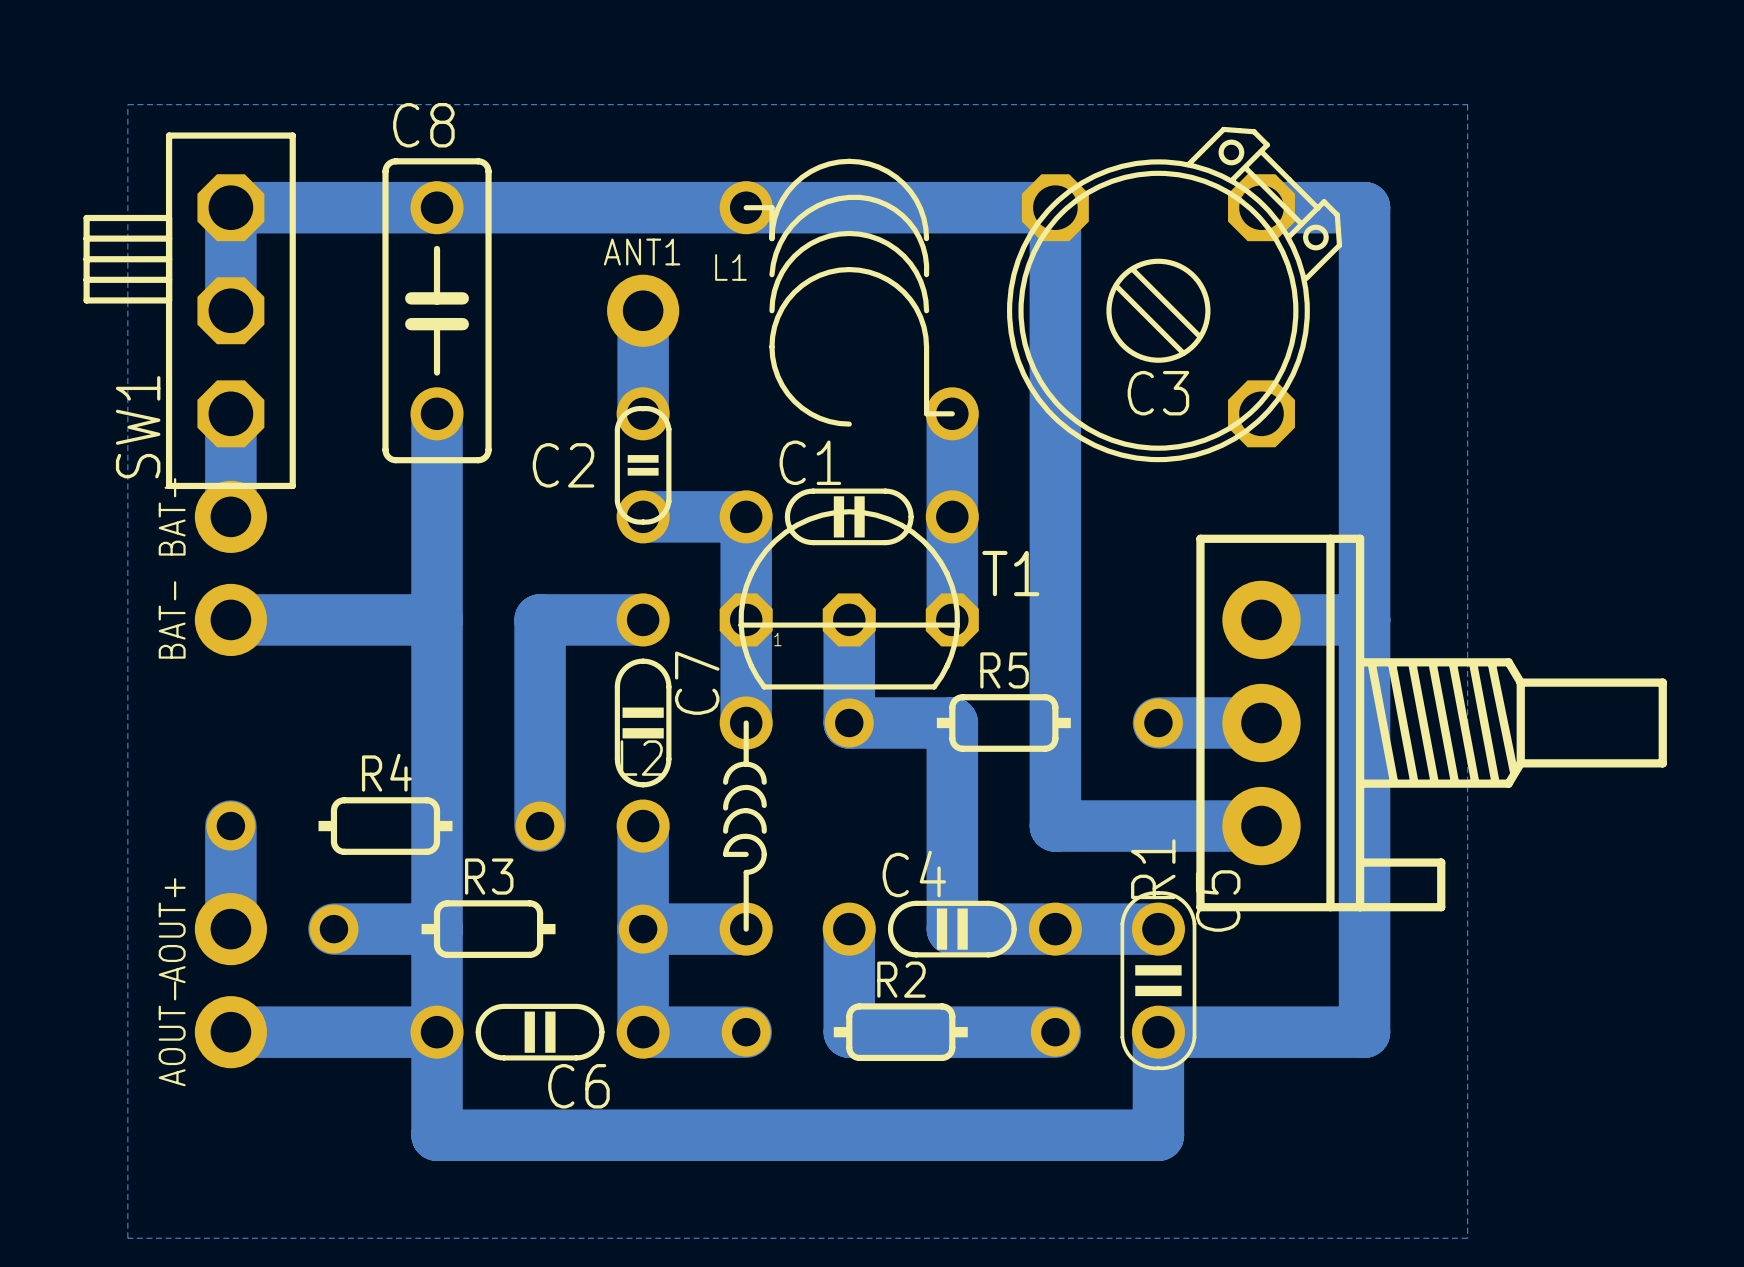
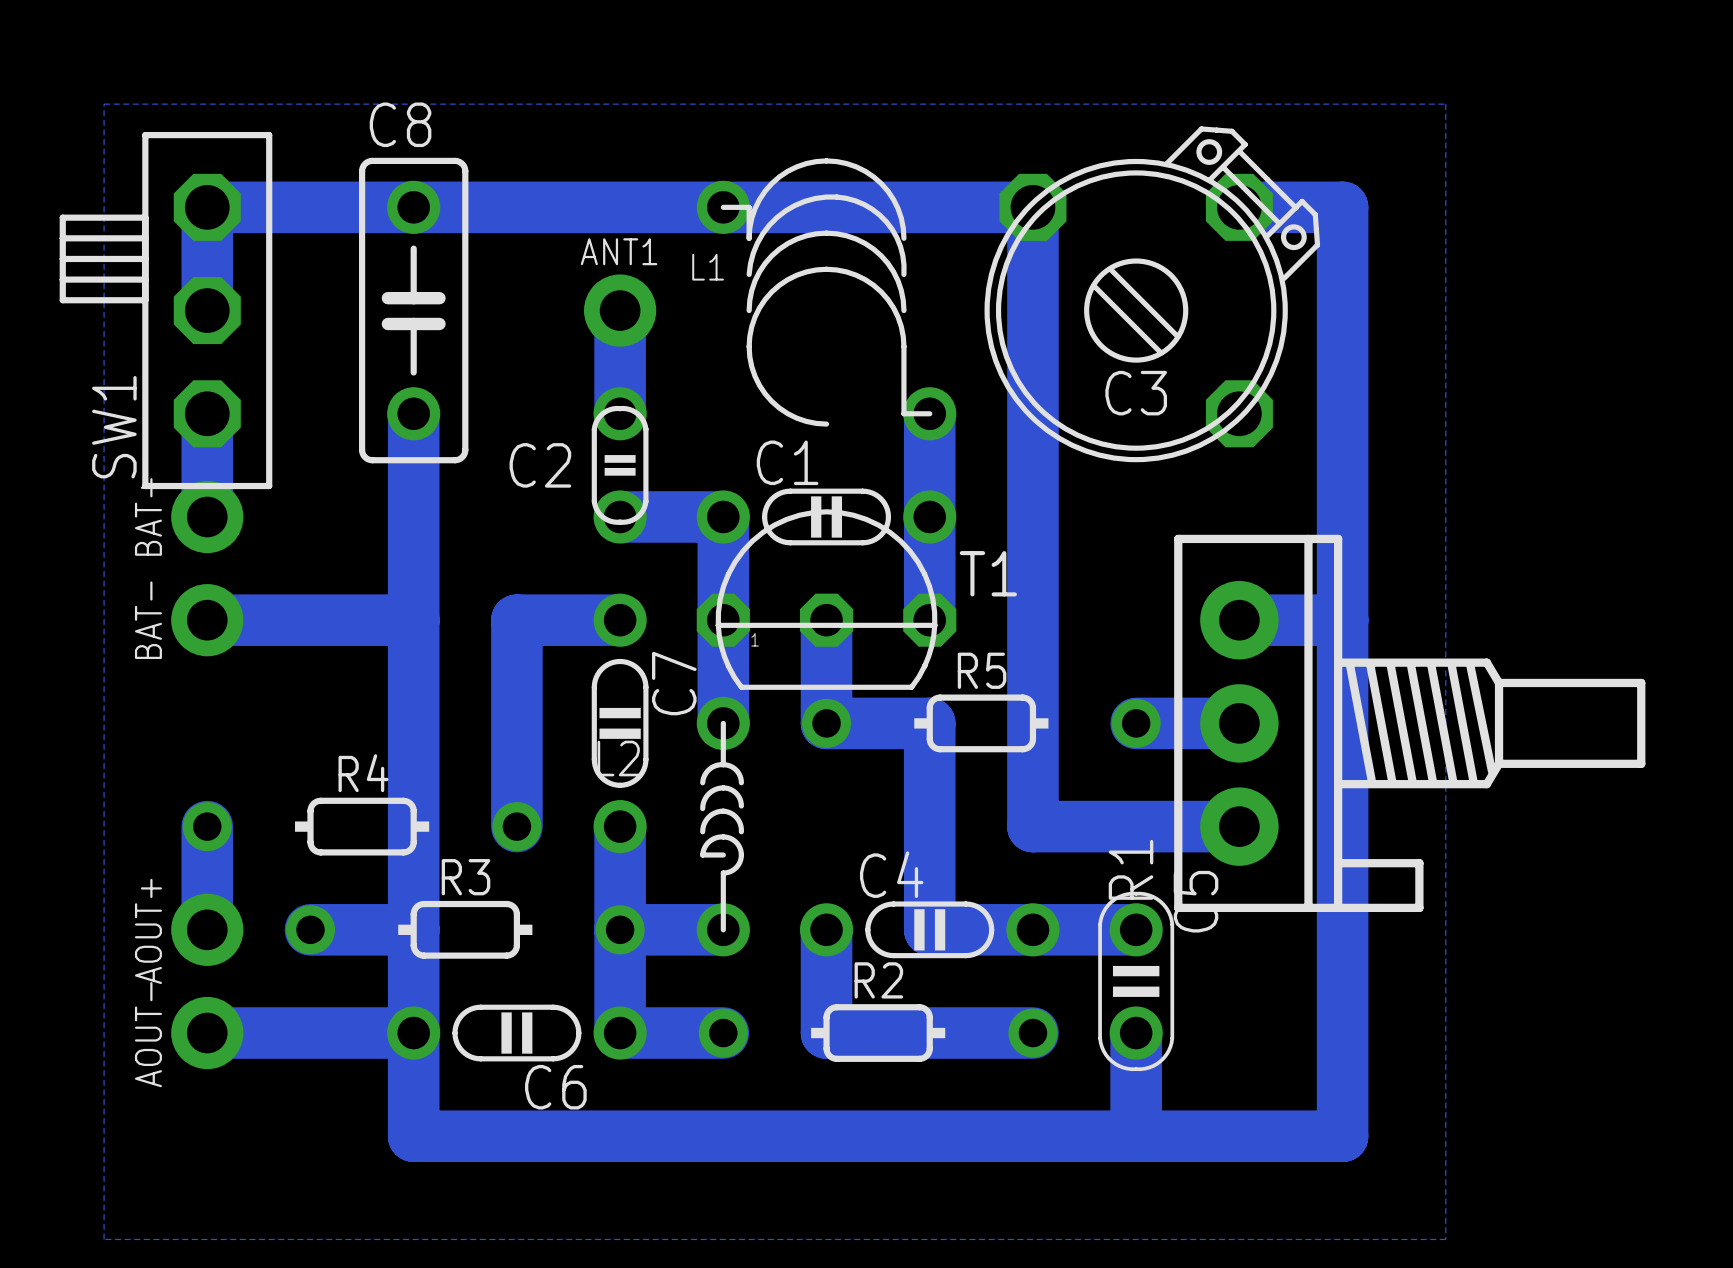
bottom track: (1158, 1032) (1364, 1032) -> (1136, 1136) (1342, 1136) (1342, 1033)

